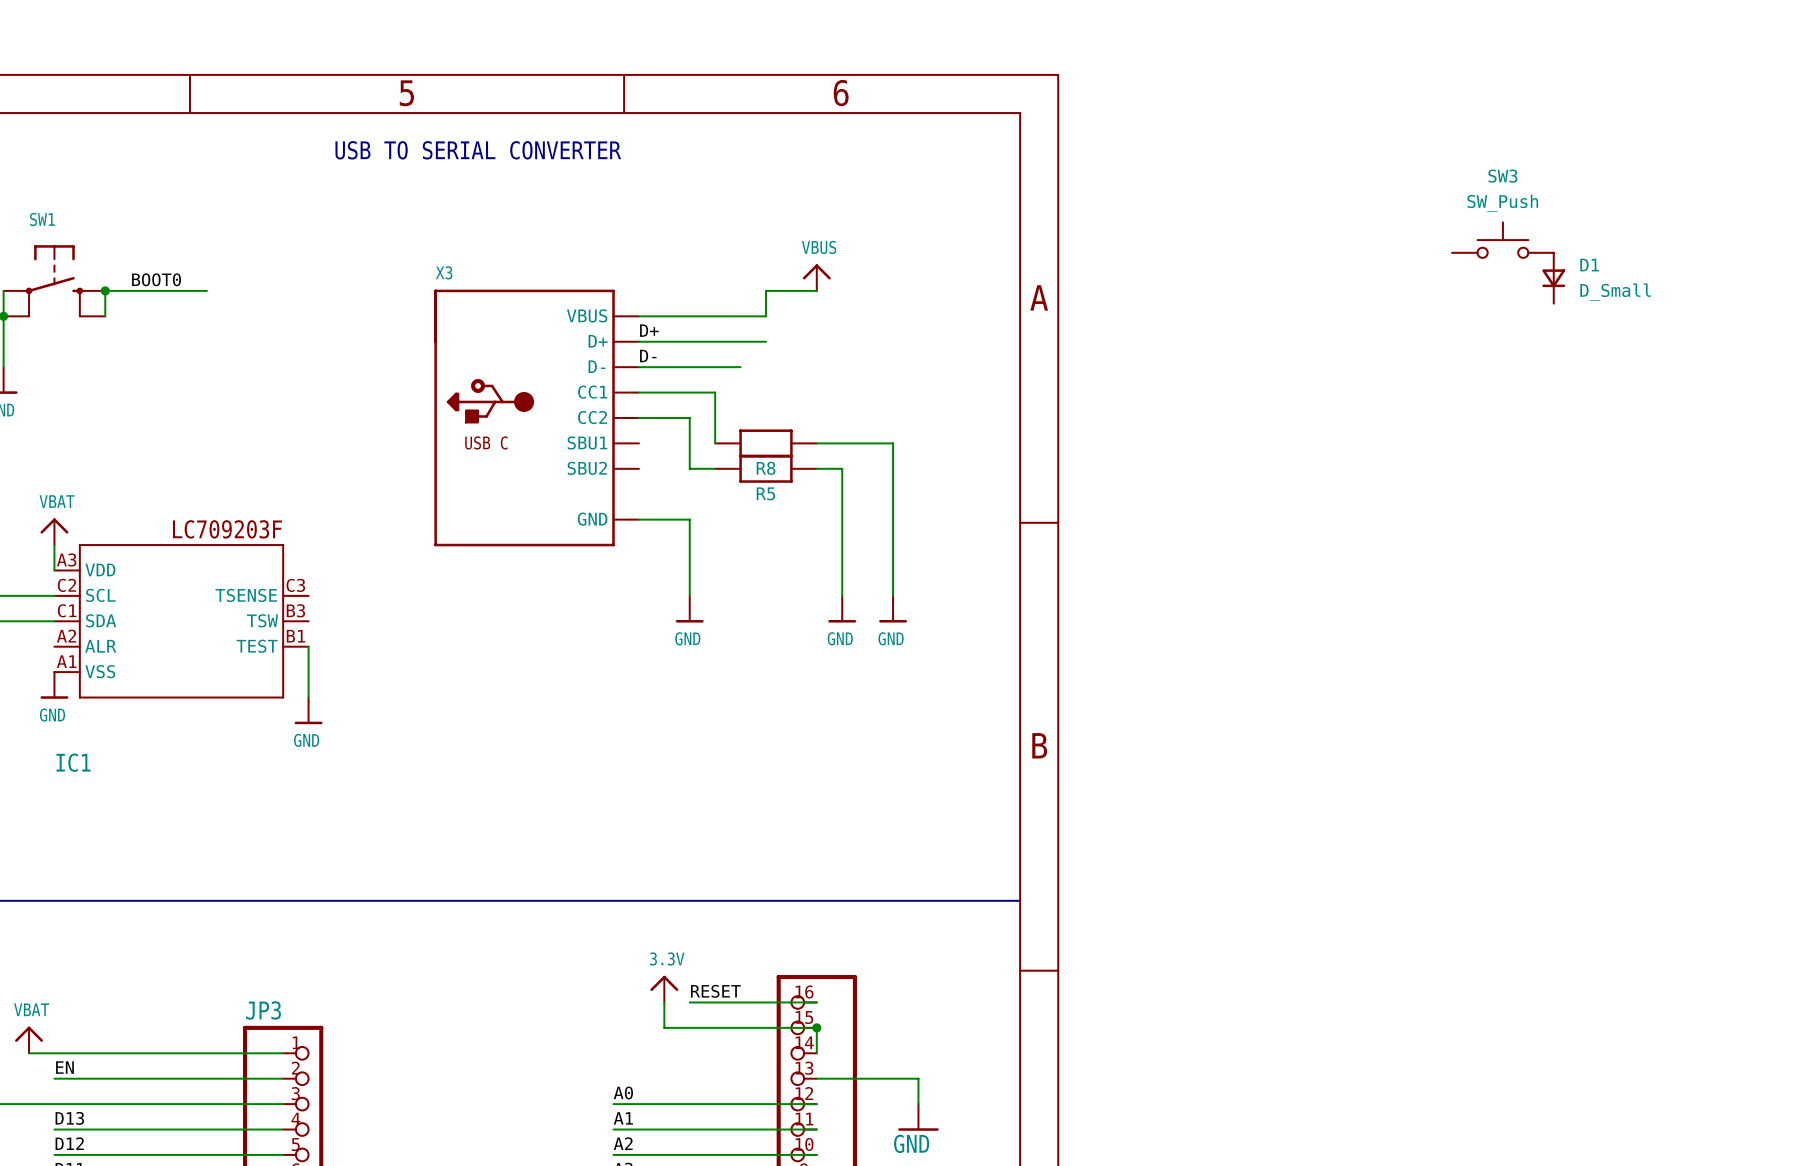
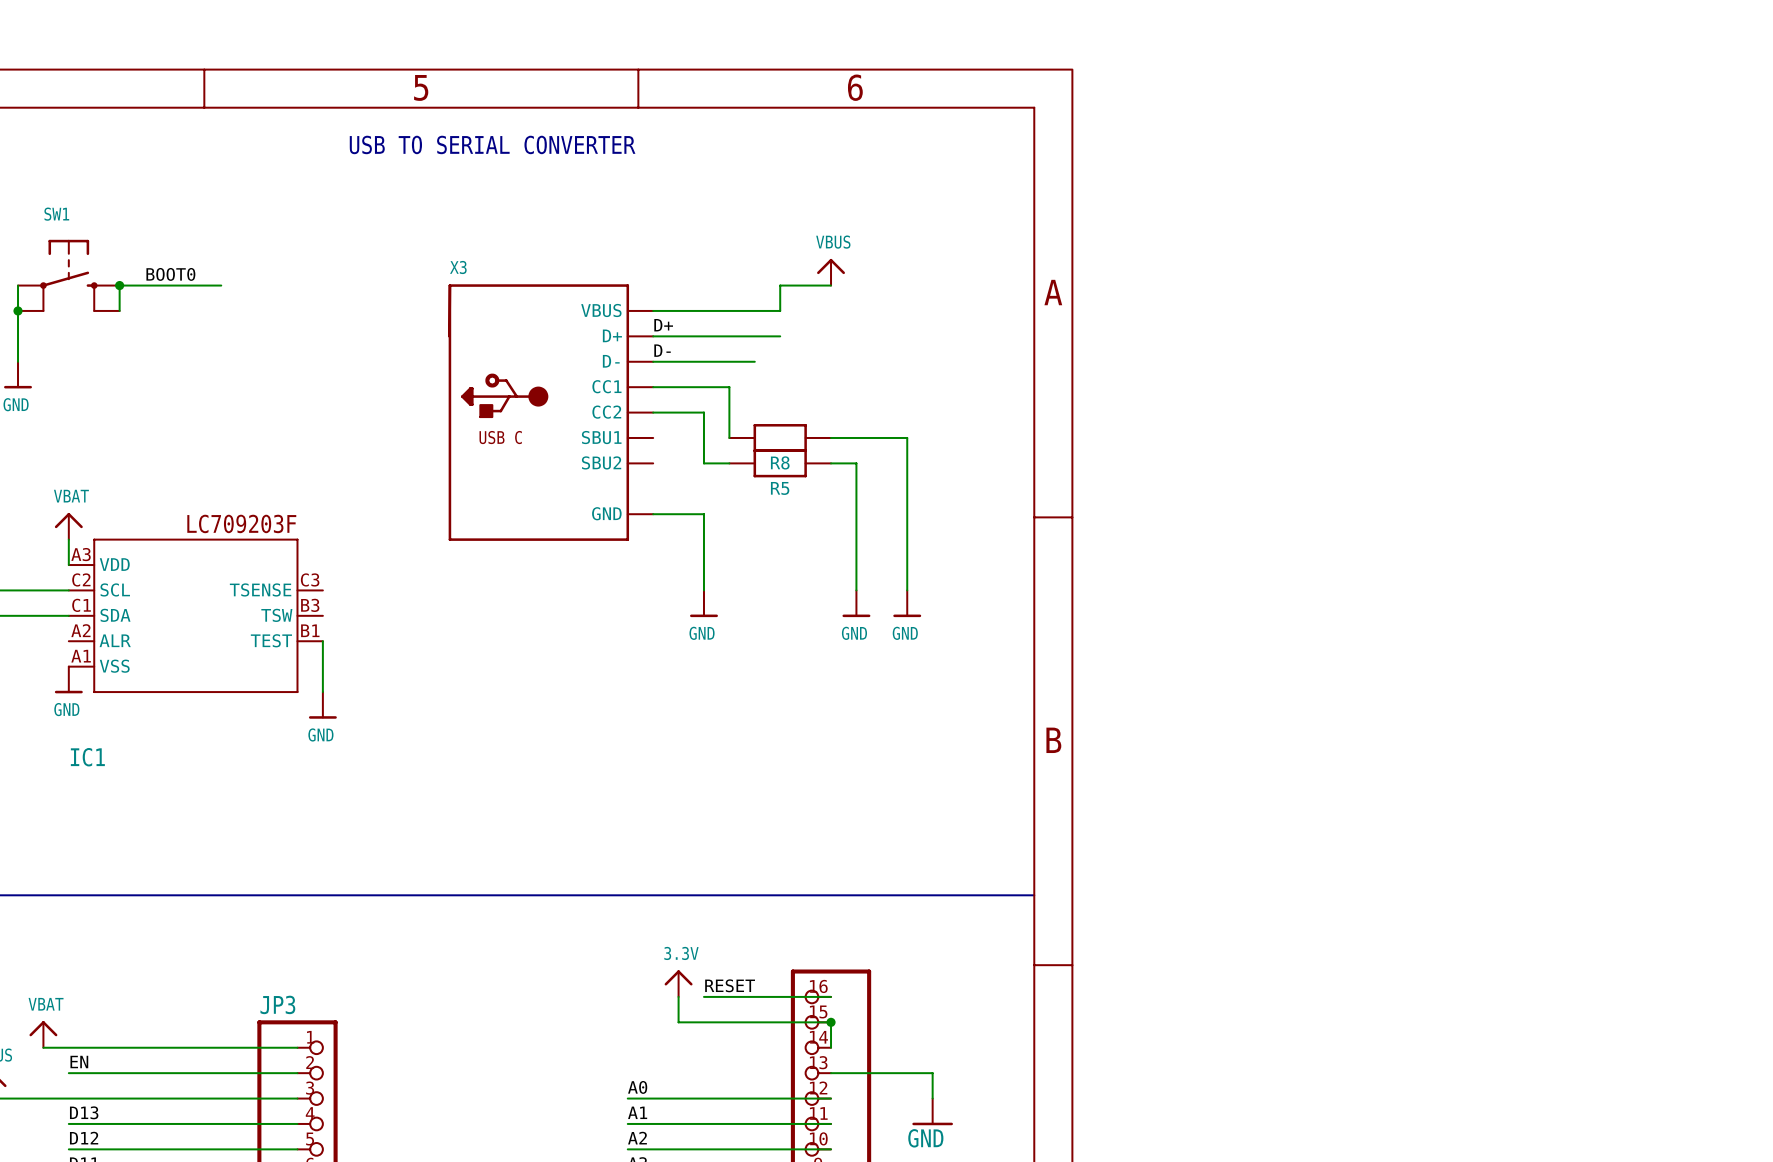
SW3: SW_Push (1502, 240) -> none
D1: D_Small (1553, 278) -> none

